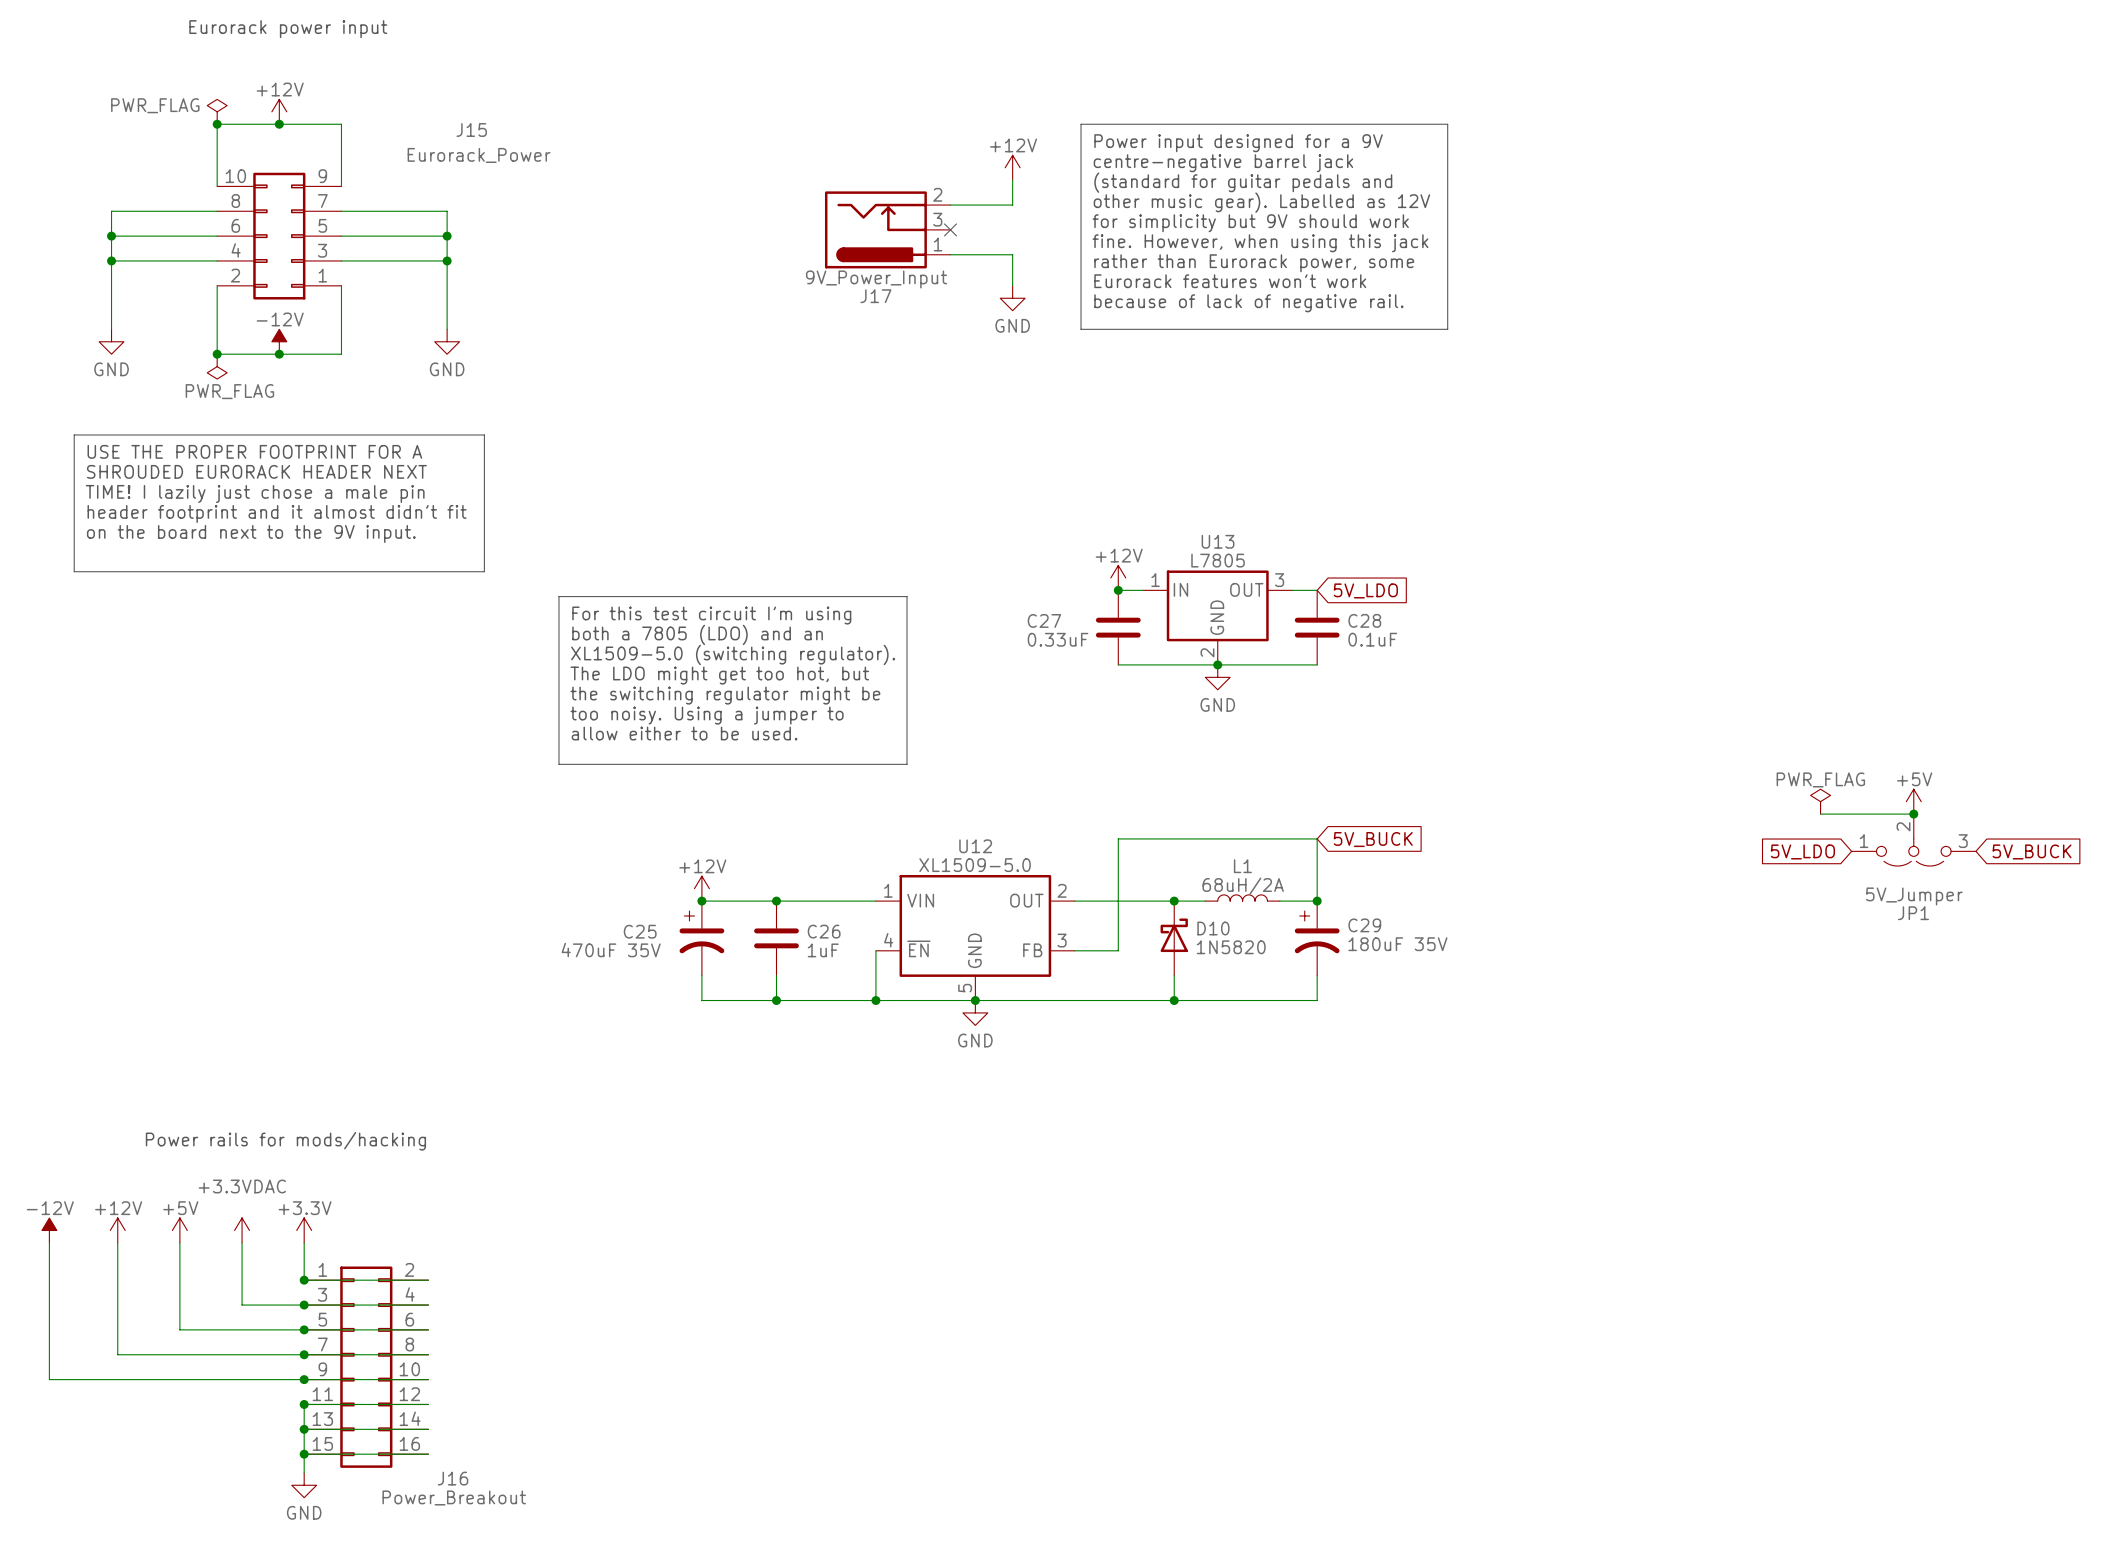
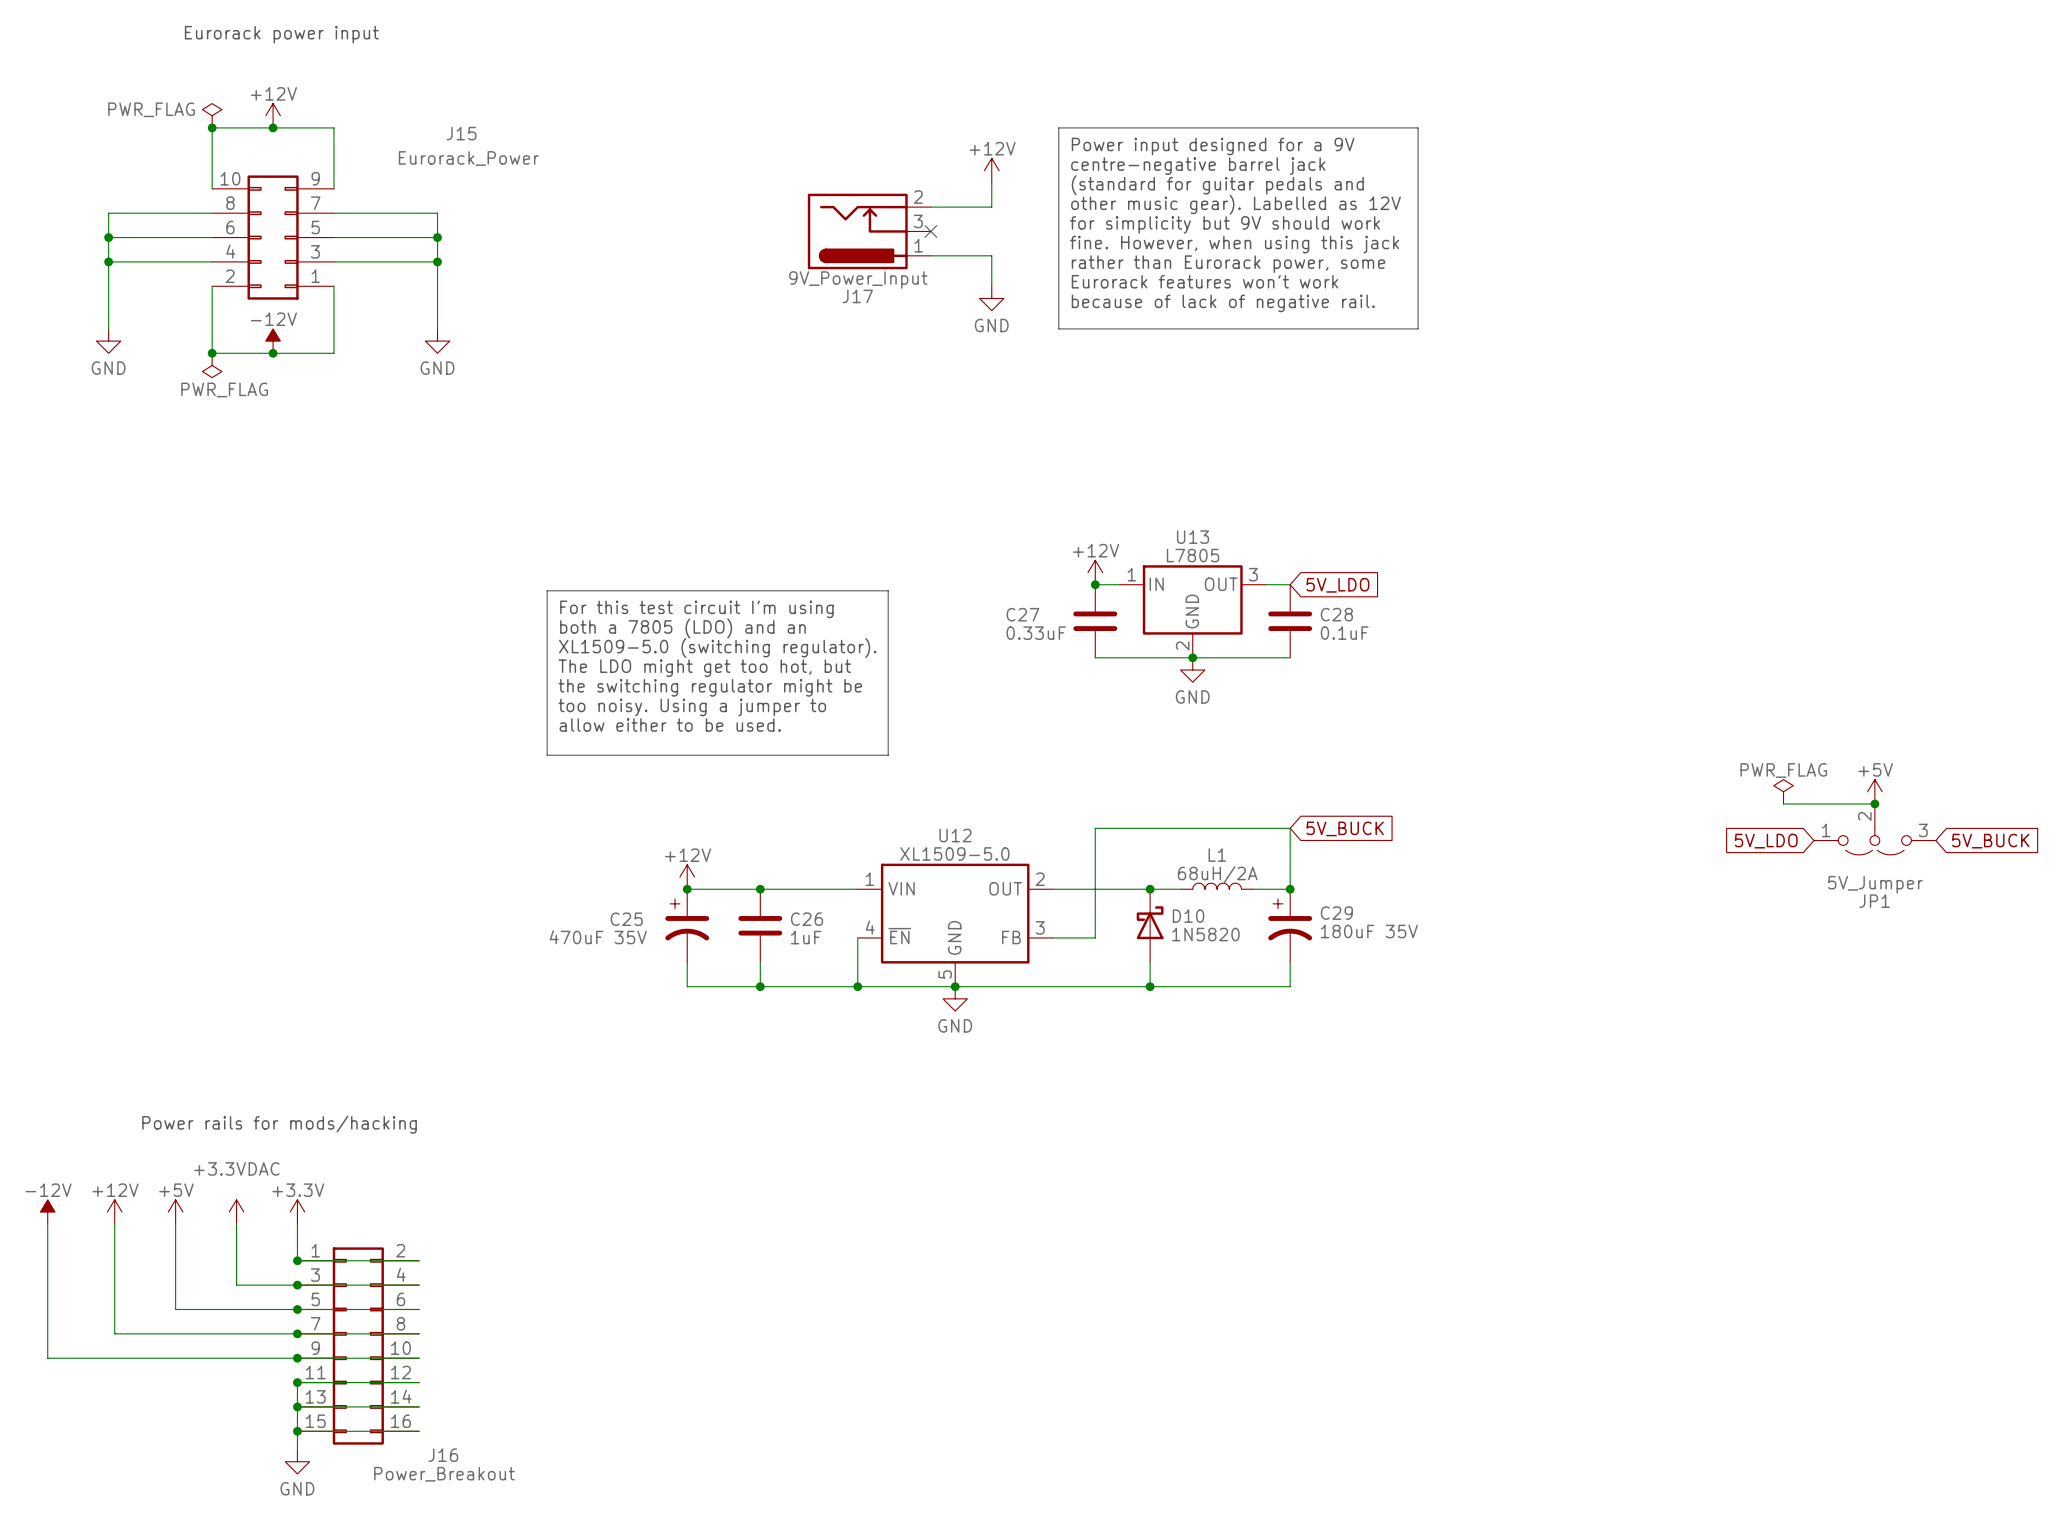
line: (74, 434) (484, 434) (484, 571) (74, 571) (74, 434) -> none
text: USE THE PROPER FOOTPRINT FOR A (254, 451) -> none
text: SHROUDED EURORACK HEADER NEXT (256, 471) -> none
text: TIME! I lazily just chose a male pin (255, 493) -> none
text: header footprint and it almost didn't fit (277, 513) -> none
text: on the board next to the 9V input. (251, 533) -> none

